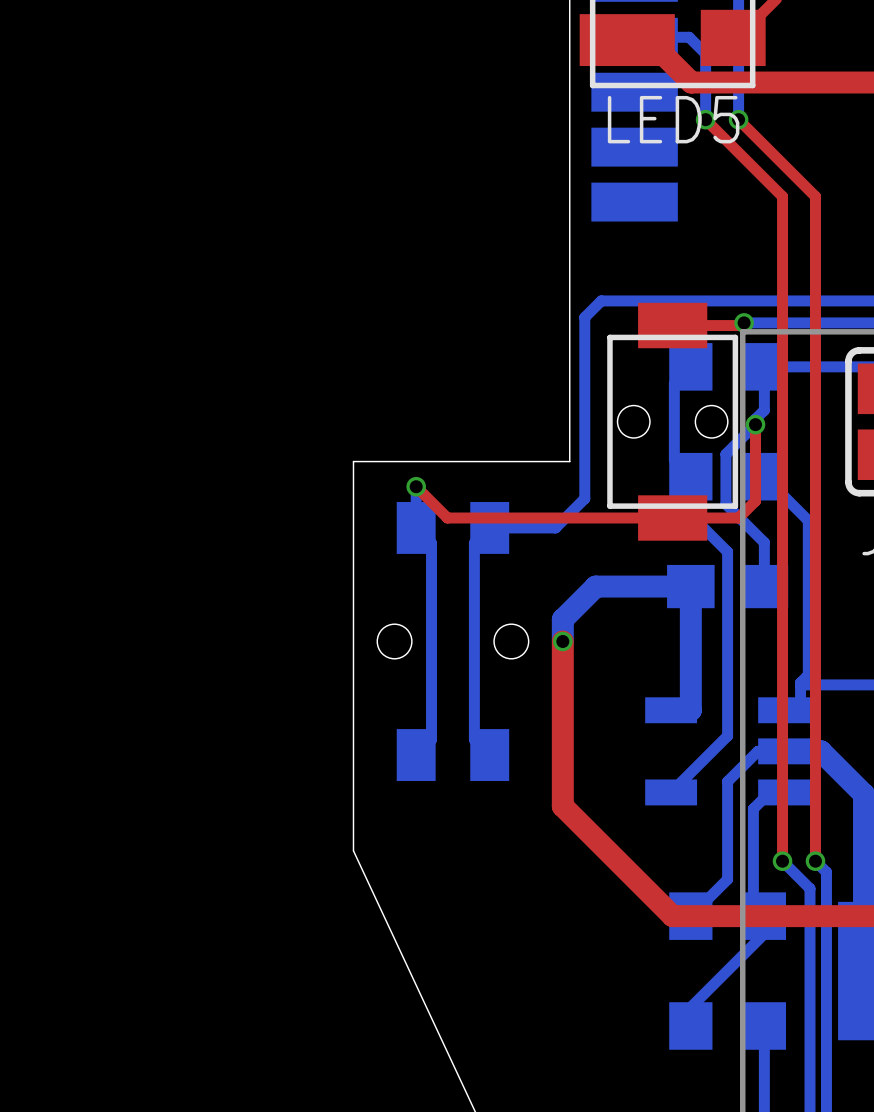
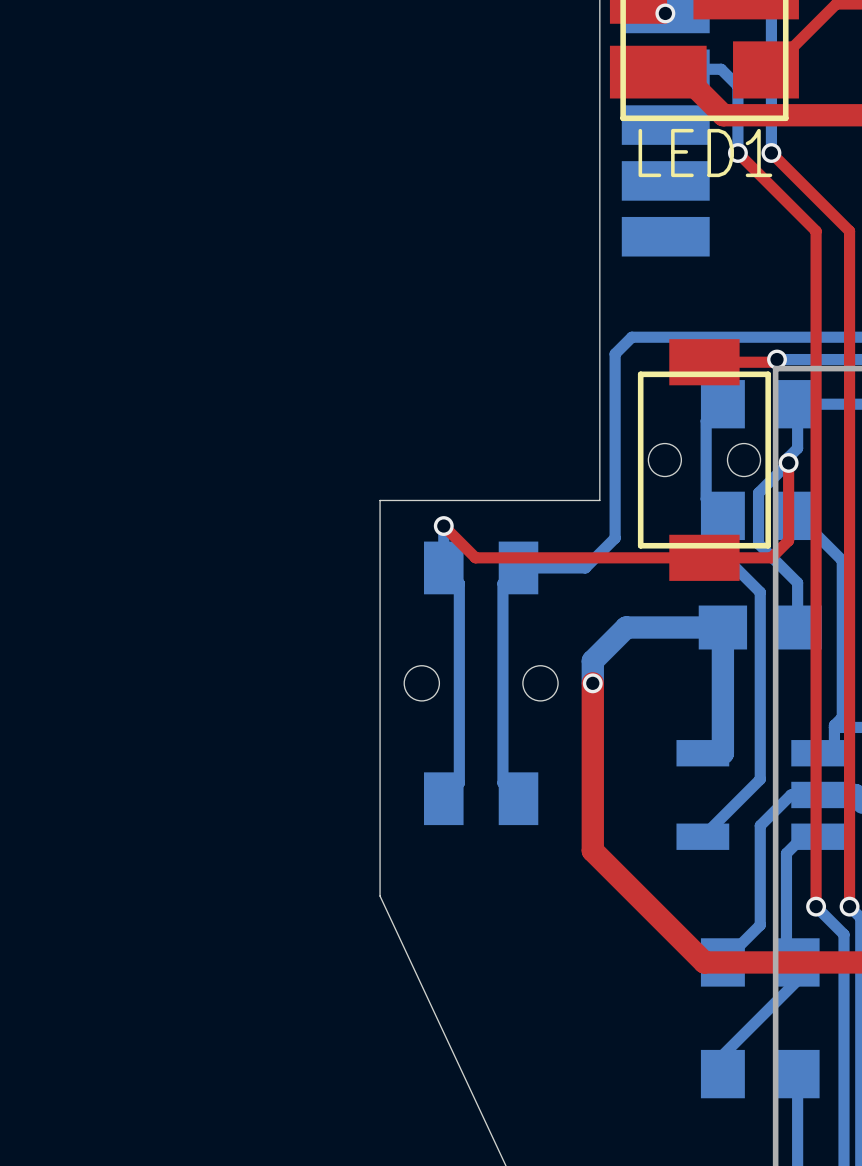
LED5 name: LED5 (673, 119) -> LED1 (705, 153)

